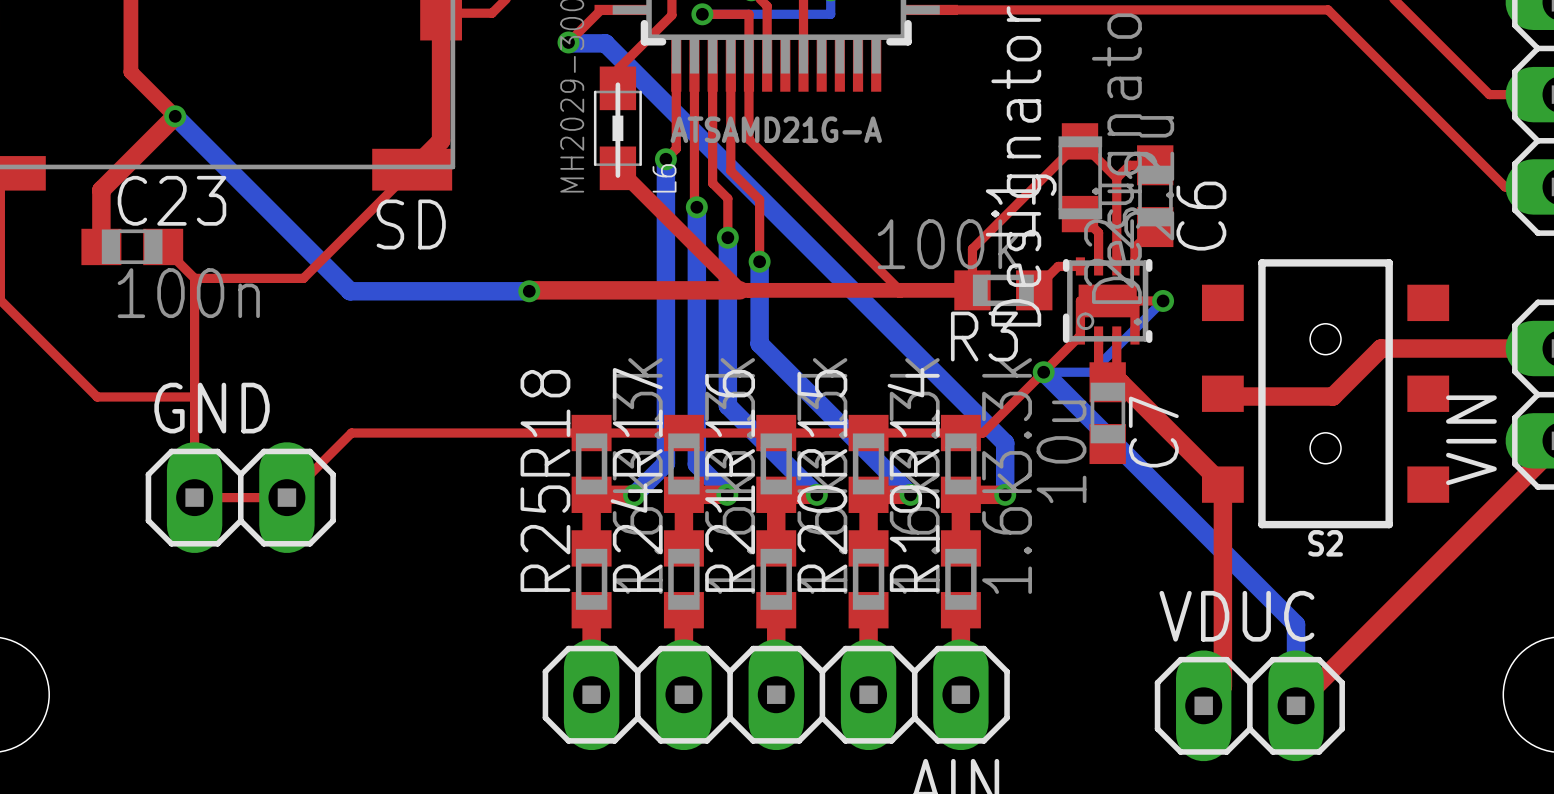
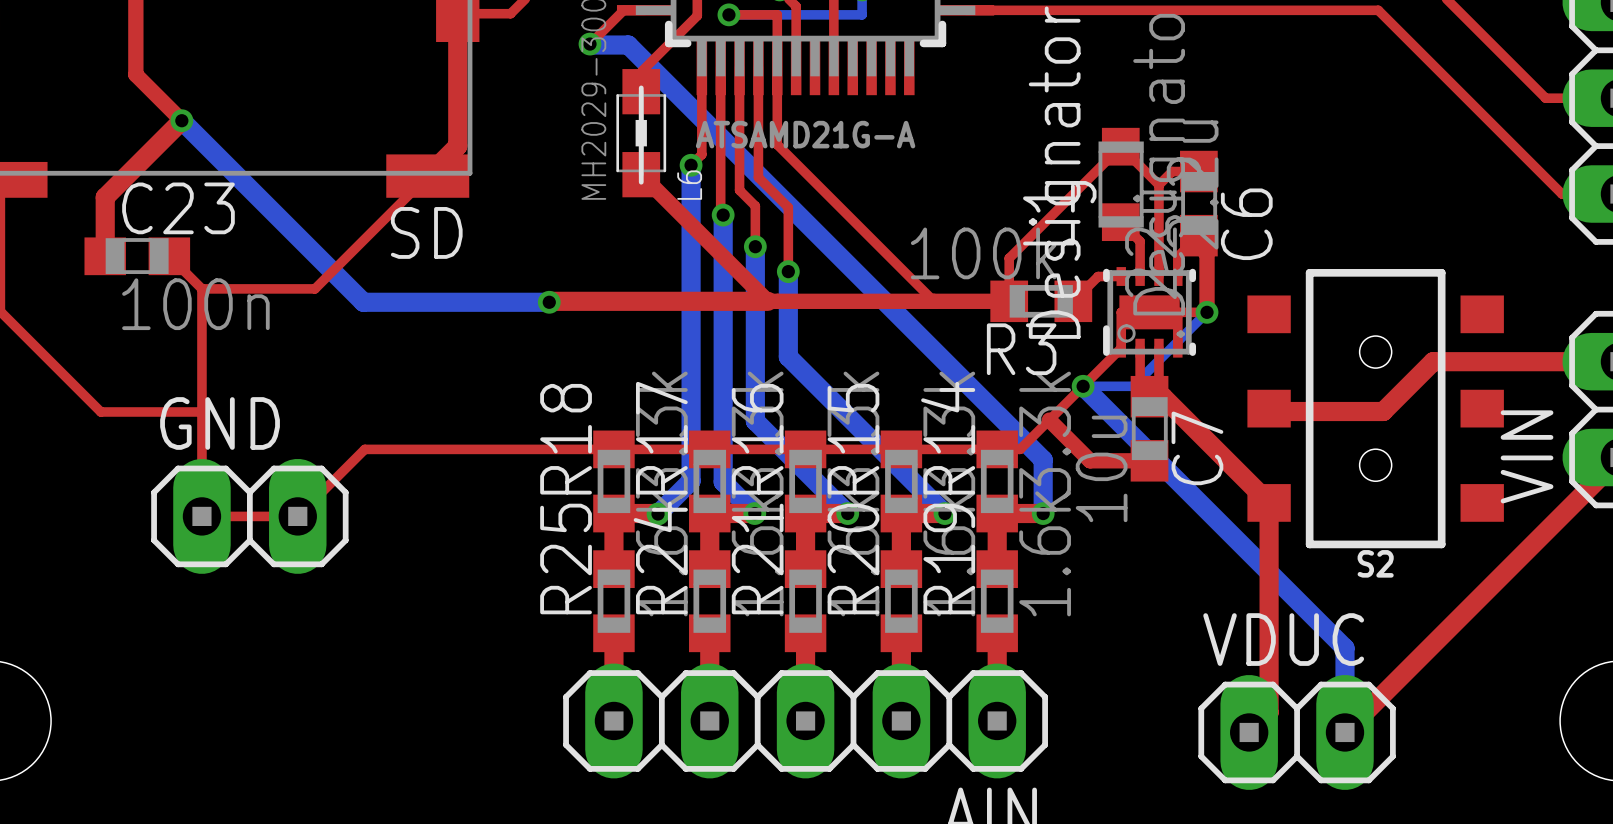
top track: none -> (1193, 240) (1207, 253) (1207, 312)
top track: none -> (1049, 420) (1090, 460) (1149, 460)

